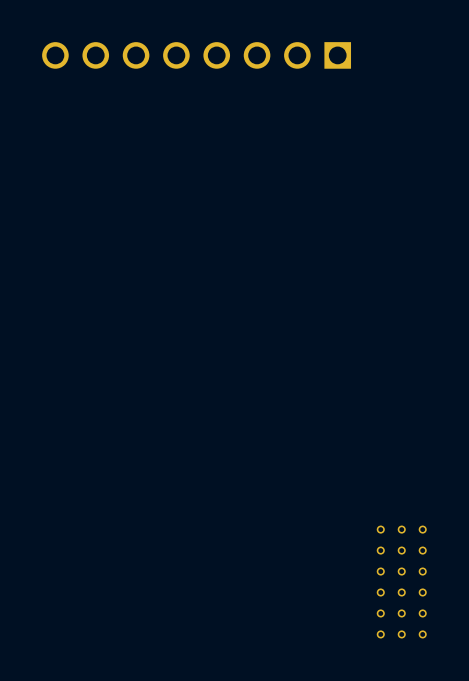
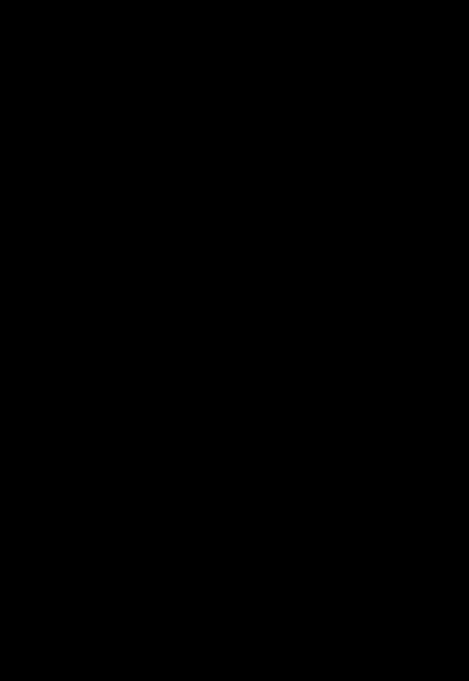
part: (196, 55) -> none
part: (401, 582) -> none

